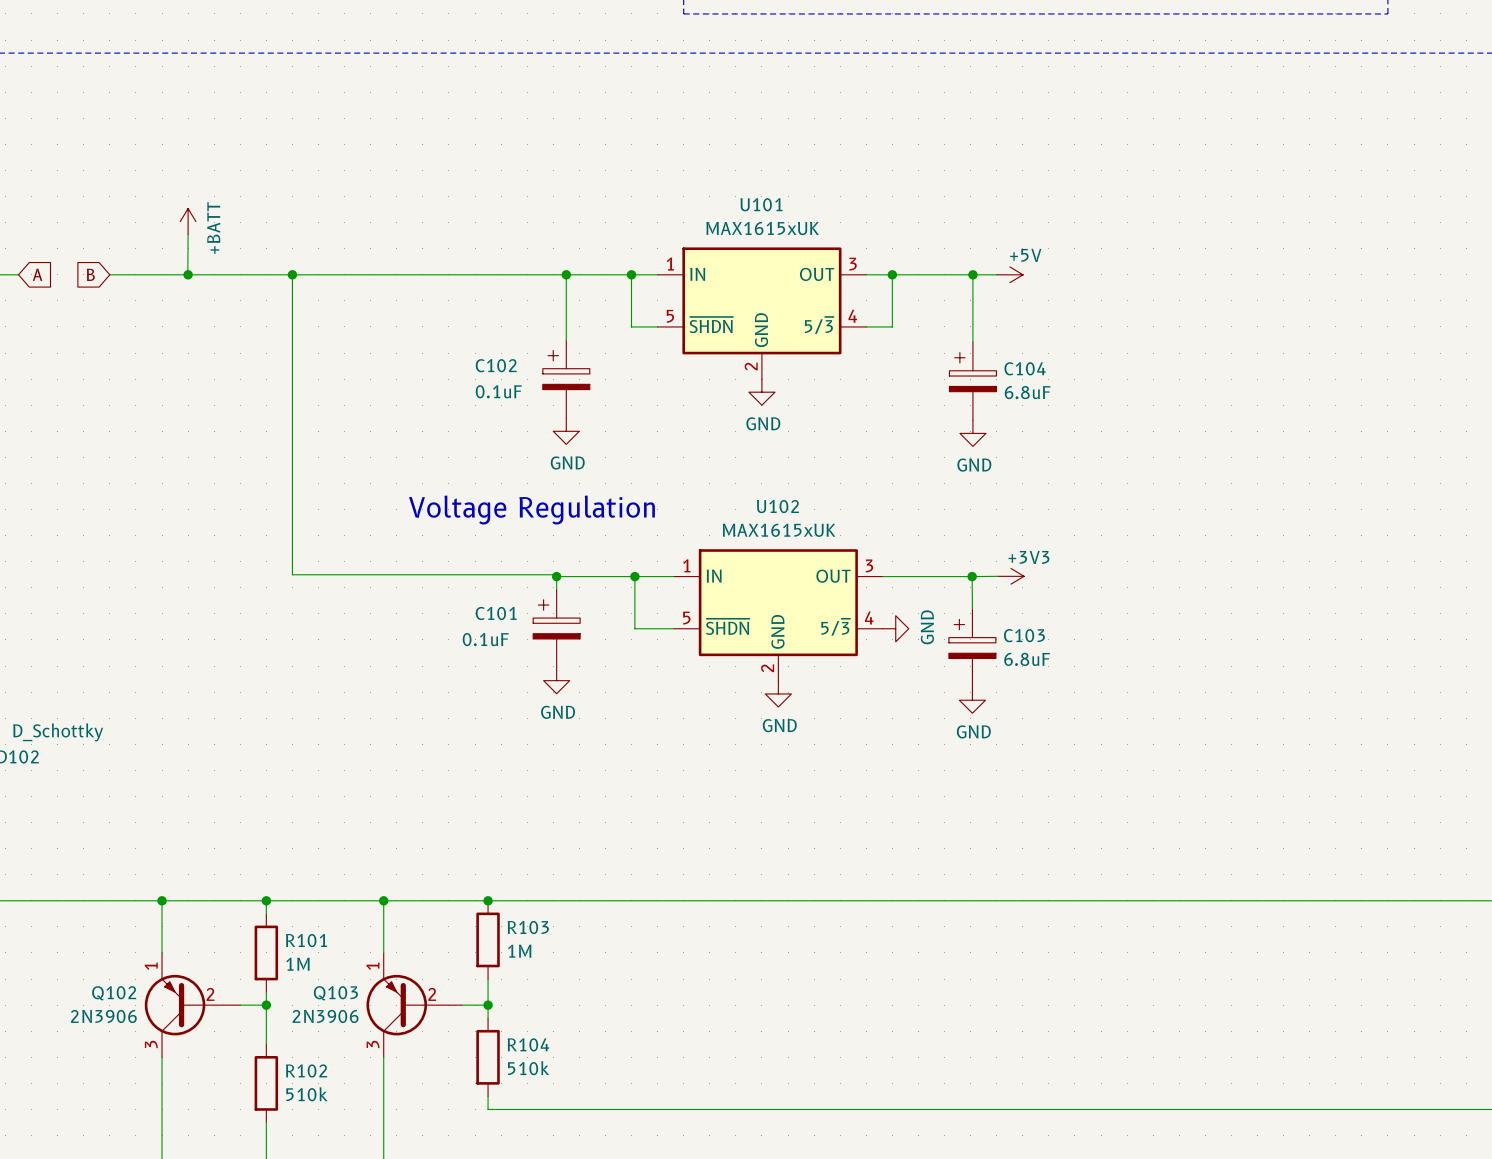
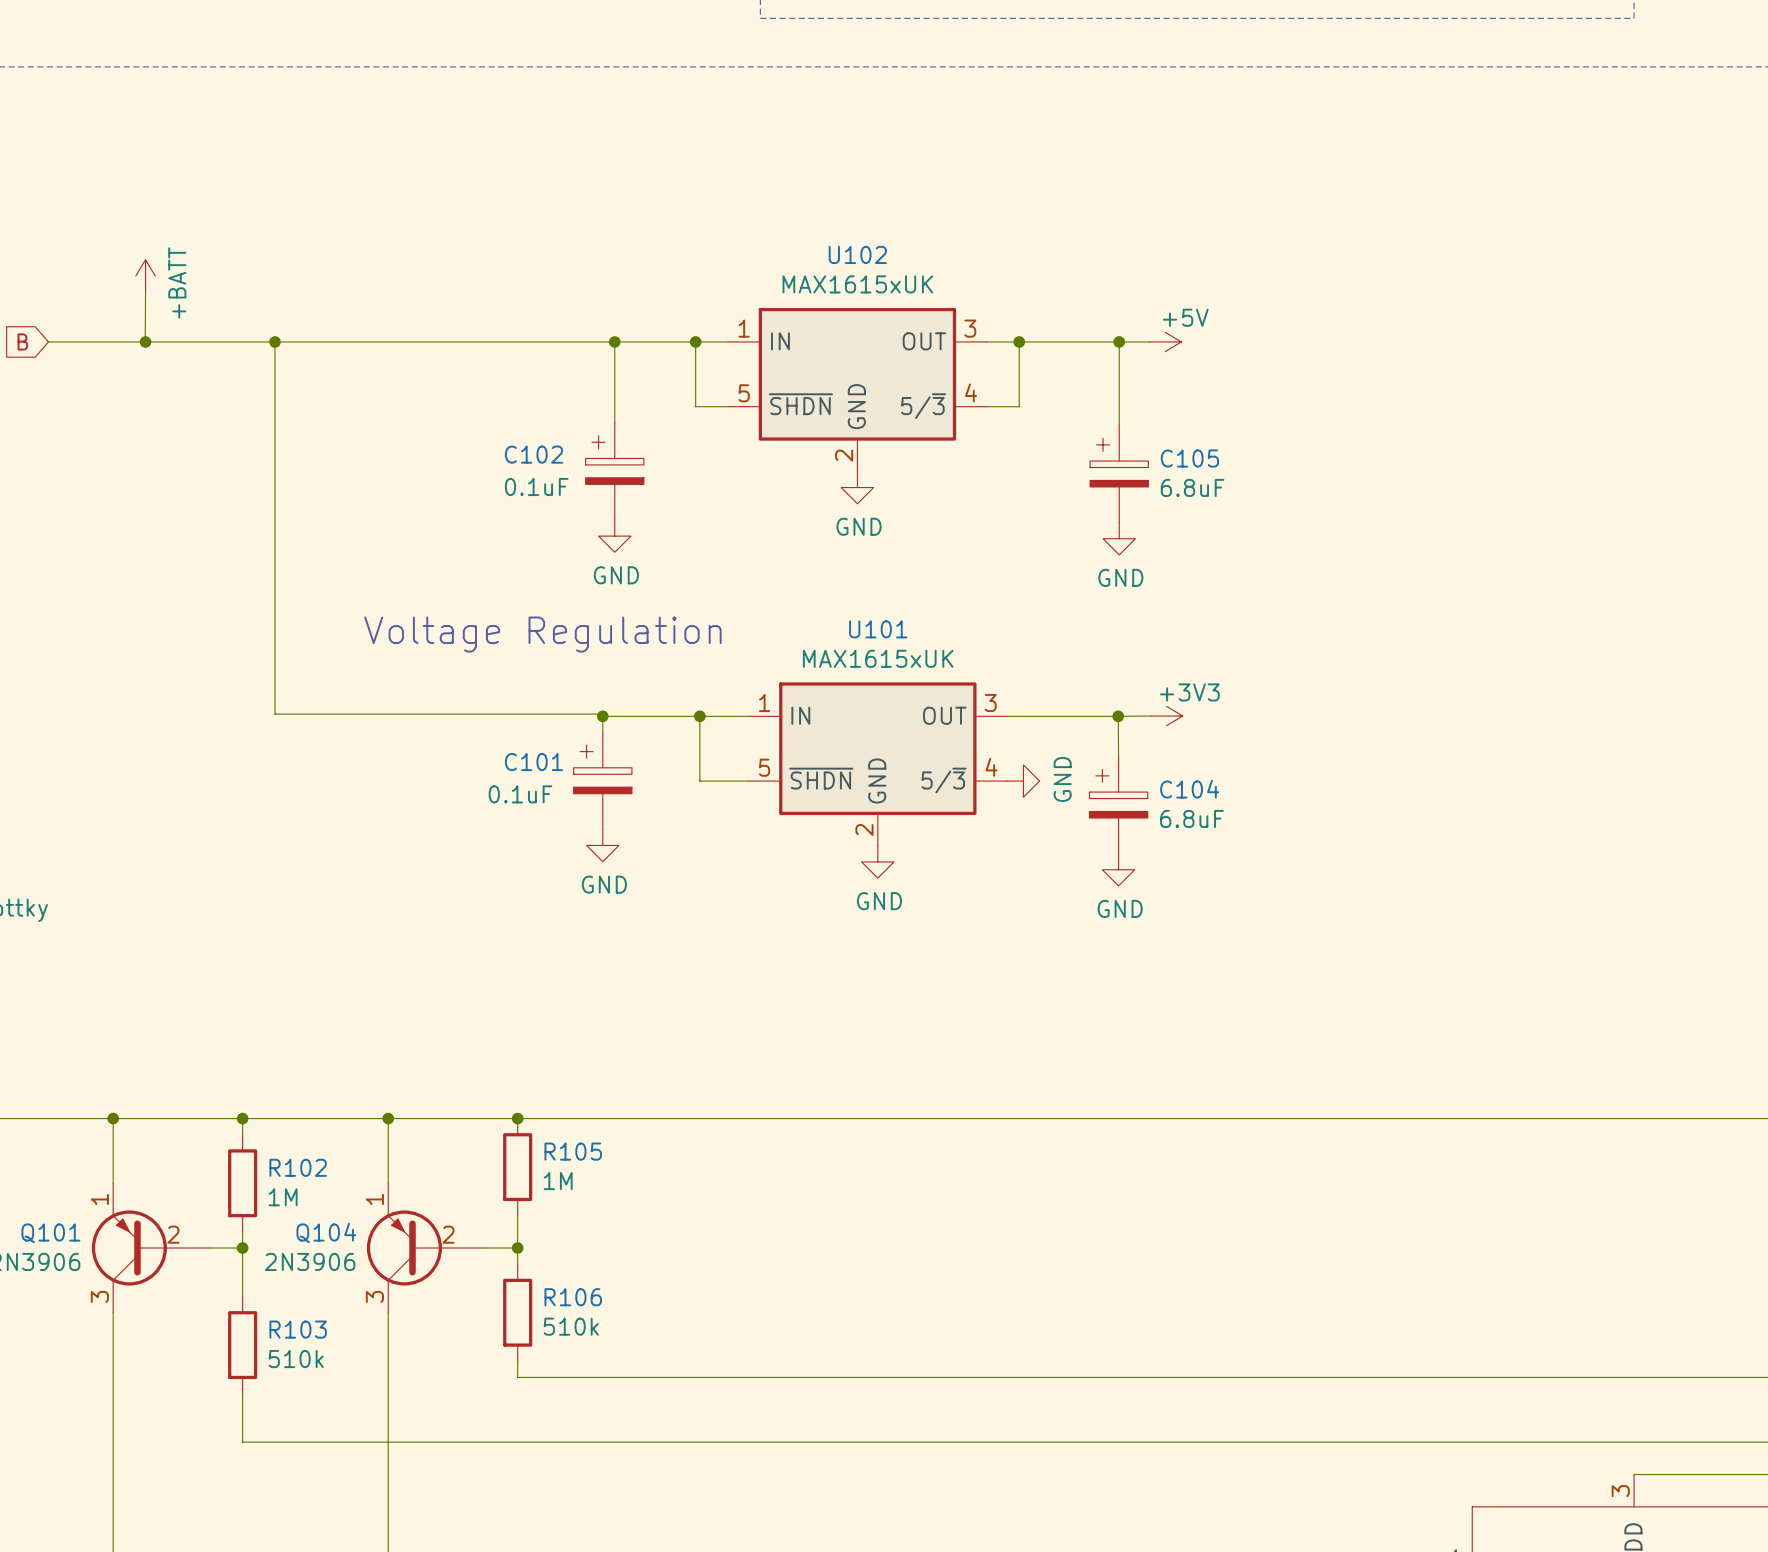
U101 name: U101 (761, 204) -> U102 (857, 254)
C104 name: C104 (1025, 368) -> C105 (1189, 458)
U102 name: U102 (777, 506) -> U101 (878, 629)
C103 name: C103 (1024, 635) -> C104 (1189, 789)
R103 name: R103 (528, 927) -> R105 (573, 1151)
R101 name: R101 (306, 940) -> R102 (298, 1167)
Q102 name: Q102 (114, 993) -> Q101 (50, 1233)
Q103 name: Q103 (335, 993) -> Q104 (326, 1232)
R104 name: R104 (528, 1044) -> R106 (573, 1297)
R102 name: R102 (306, 1070) -> R103 (298, 1329)

